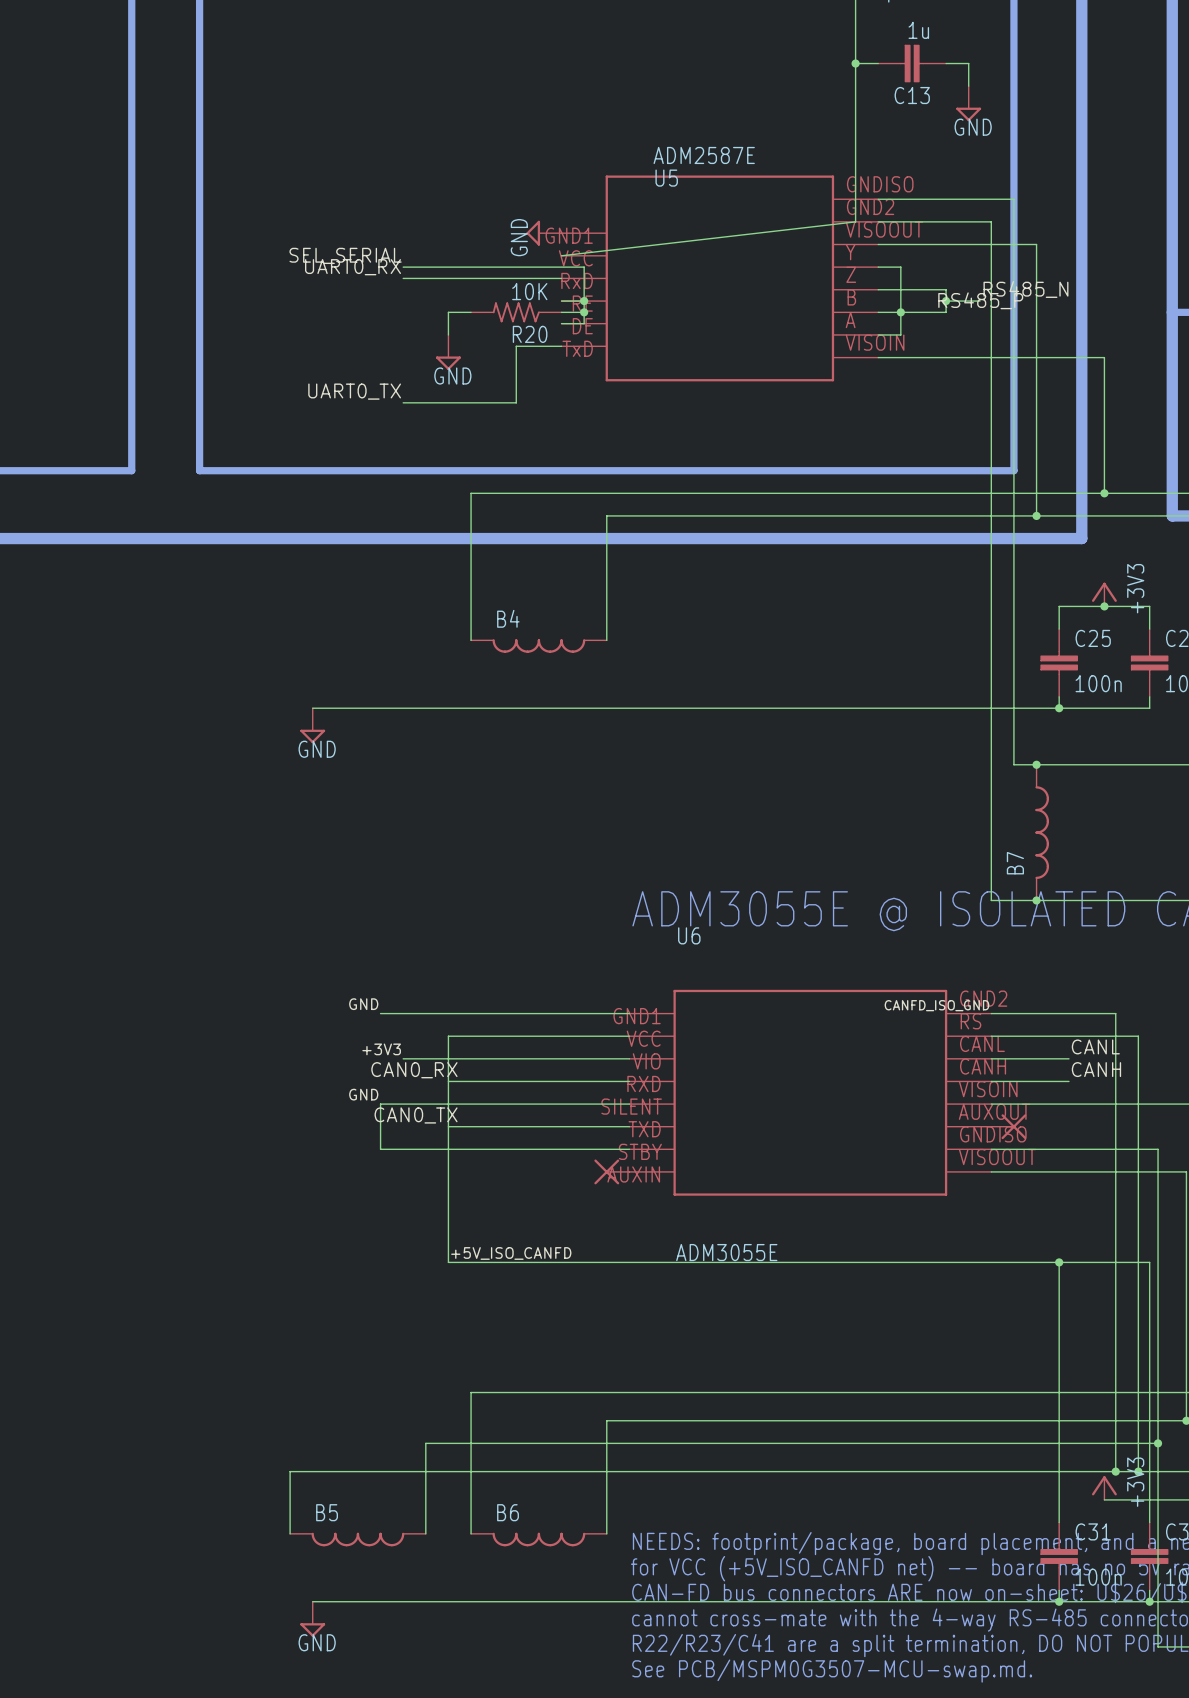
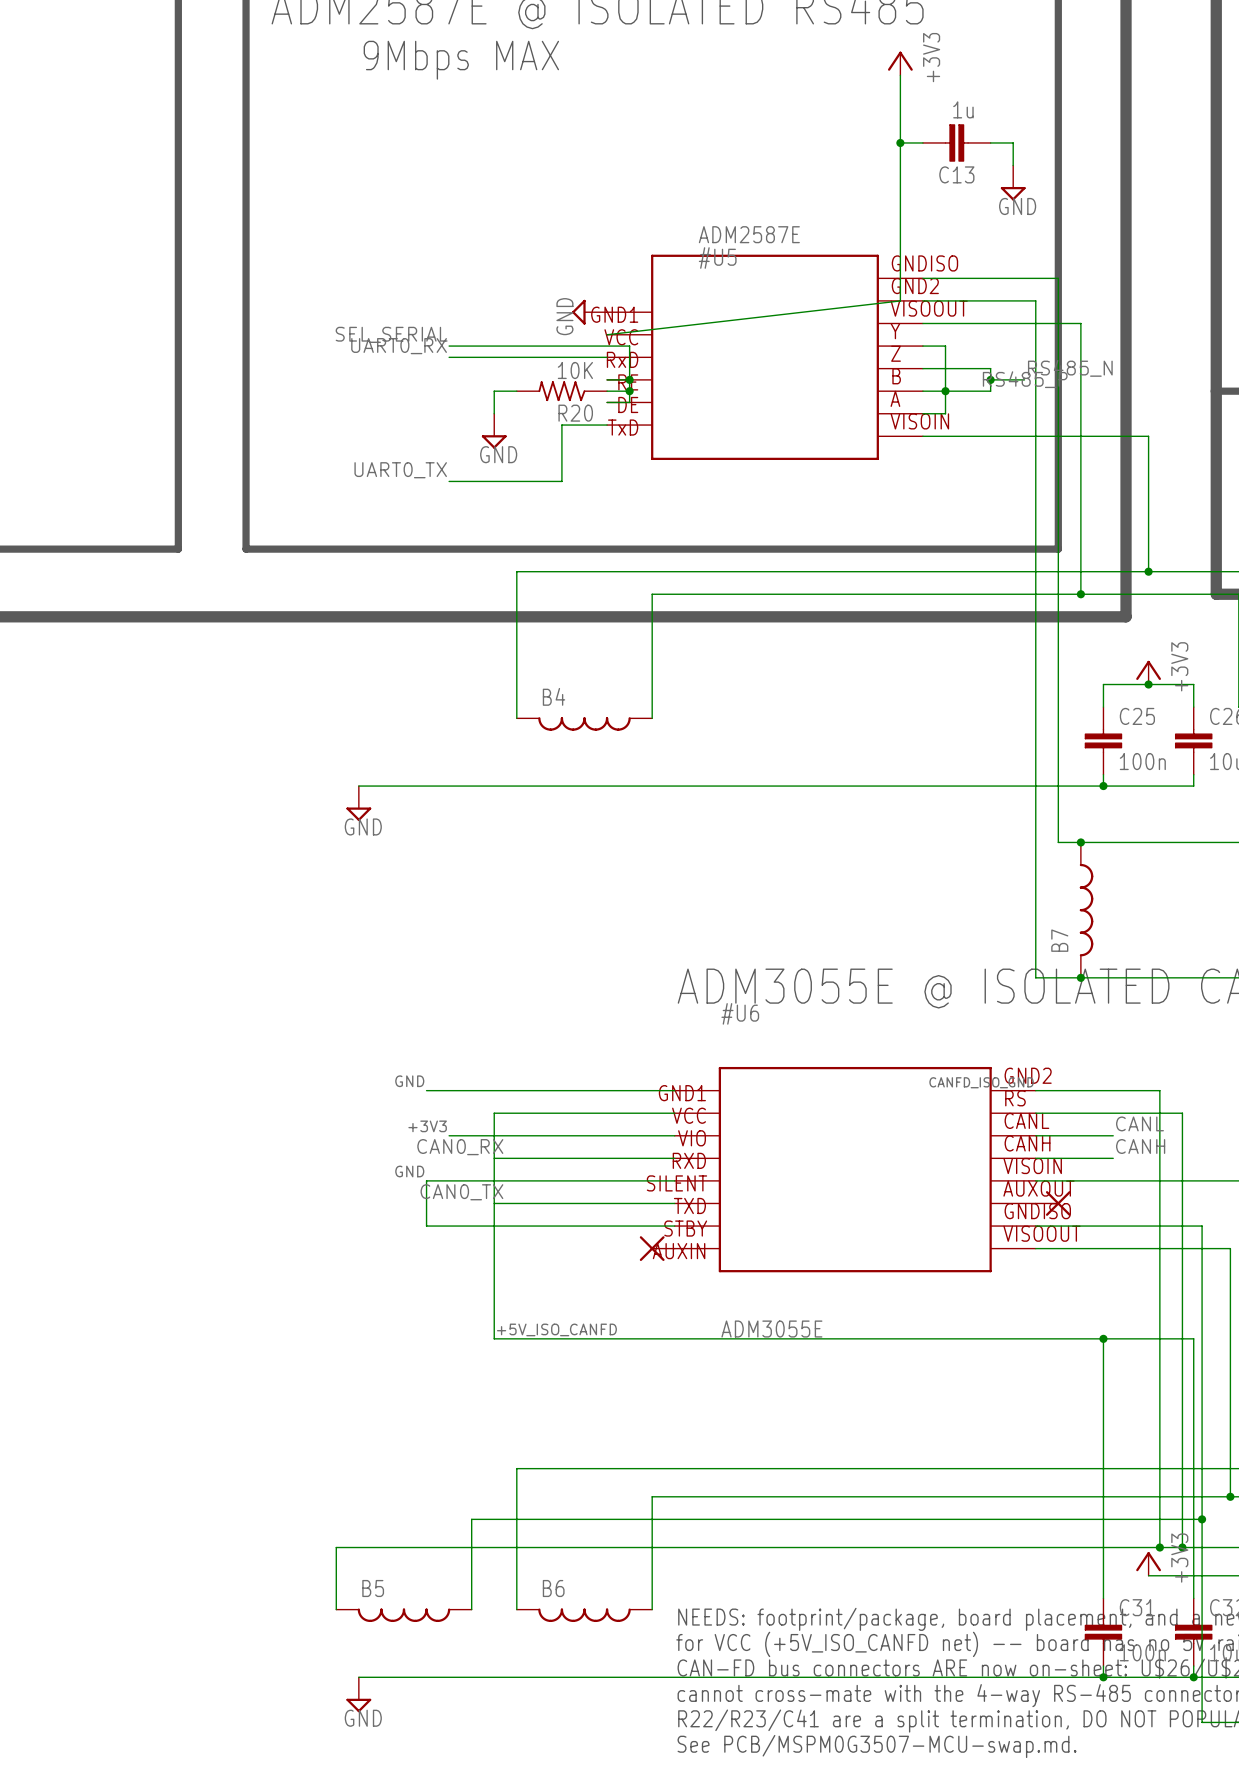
U5: ADM2587E (719, 278) -> none
#U5: none -> ADM2587E (765, 357)
U6: ADM3055E (810, 1092) -> none
#U6: none -> ADM3055E (855, 1169)

